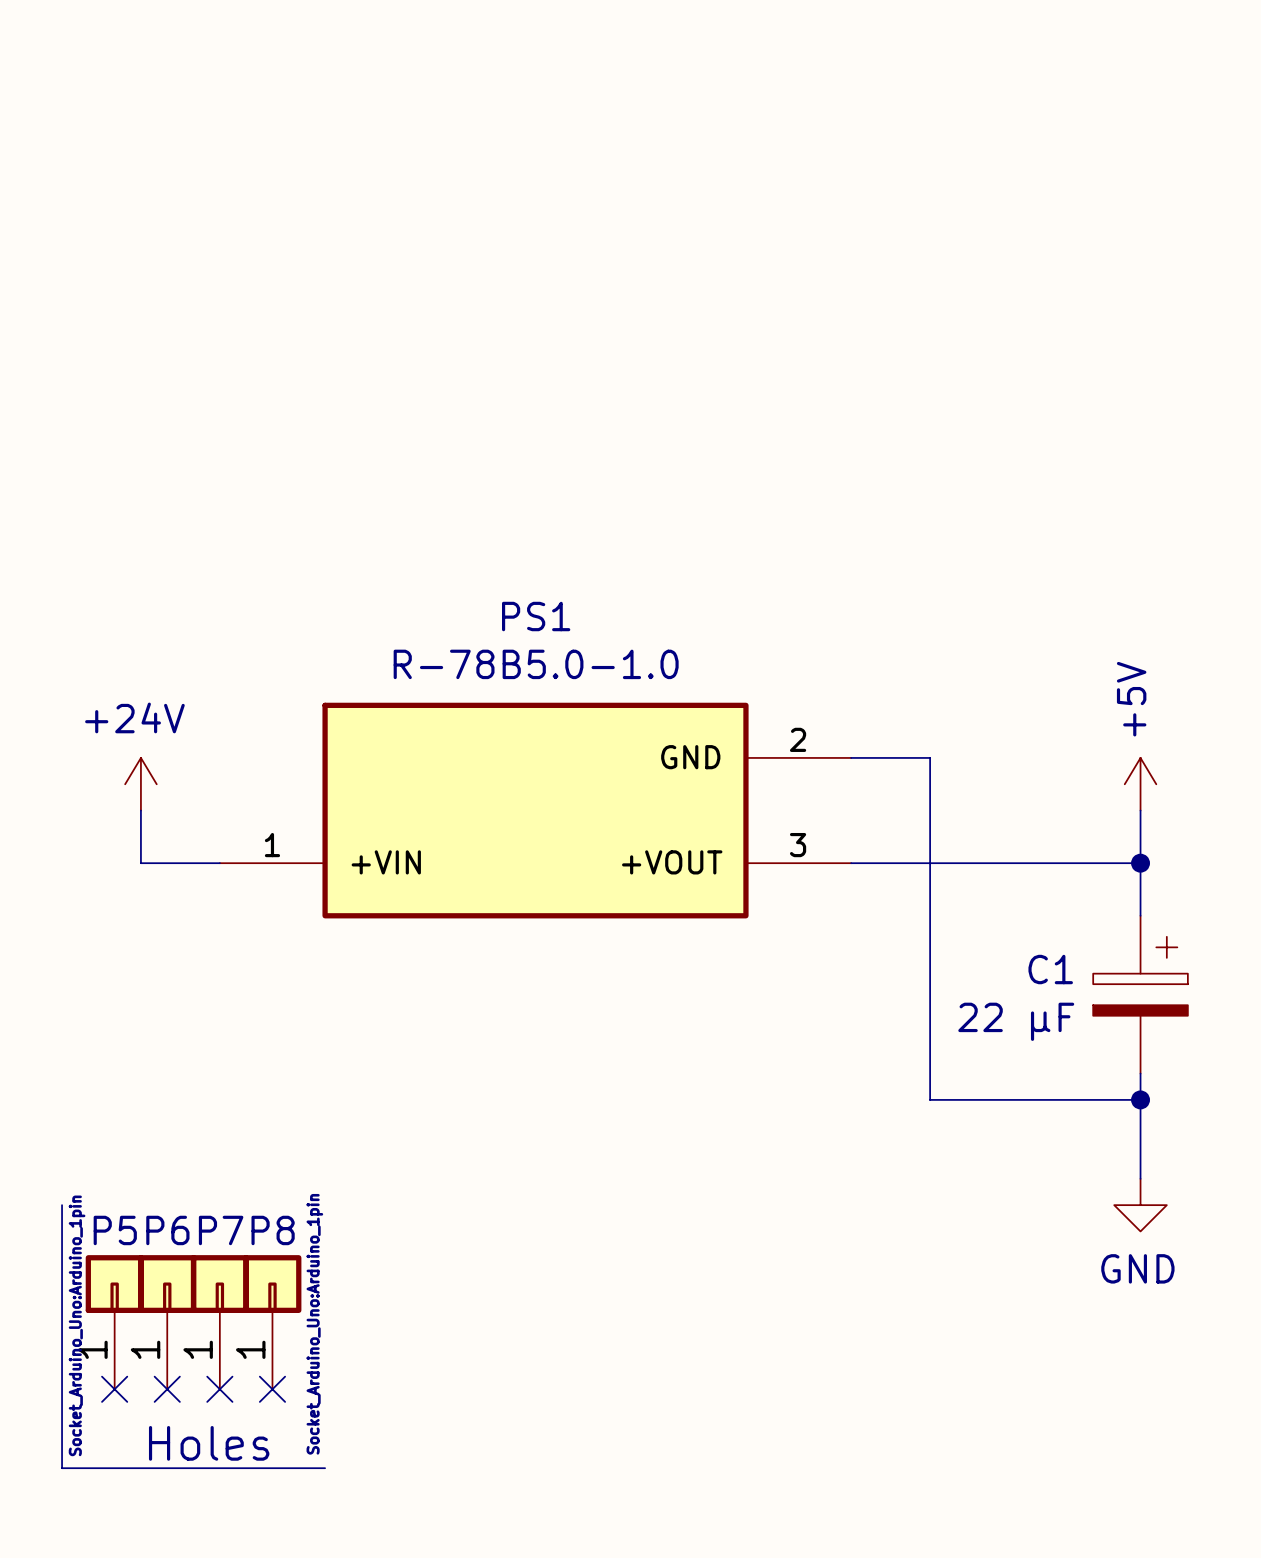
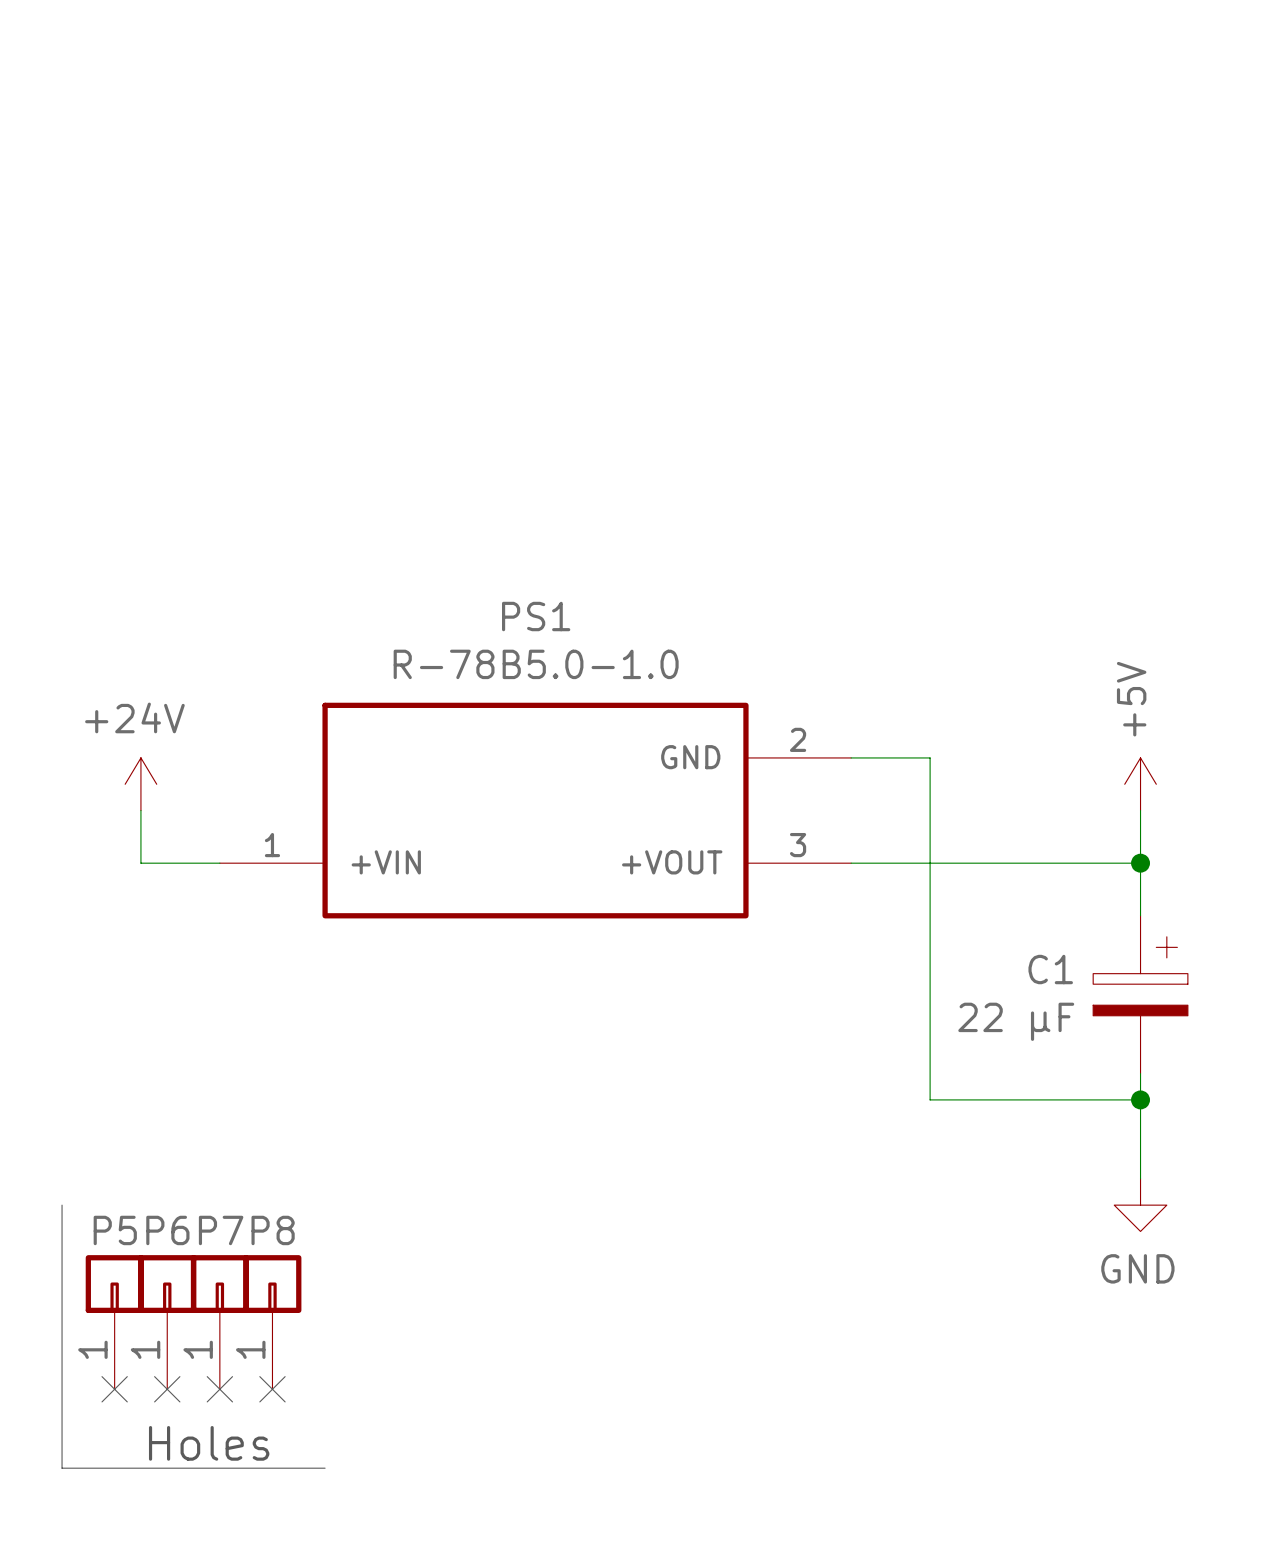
P8 text: Socket_Arduino_Uno:Arduino_1pin (314, 1324) -> none
P5 text: Socket_Arduino_Uno:Arduino_1pin (77, 1325) -> none

